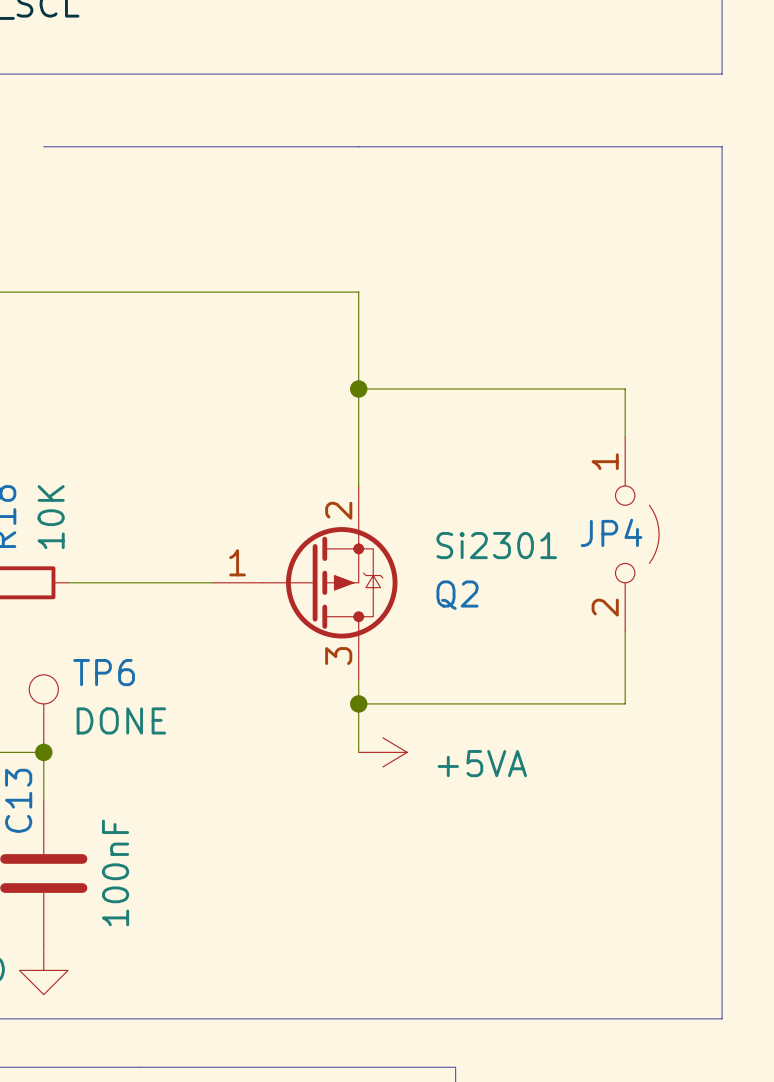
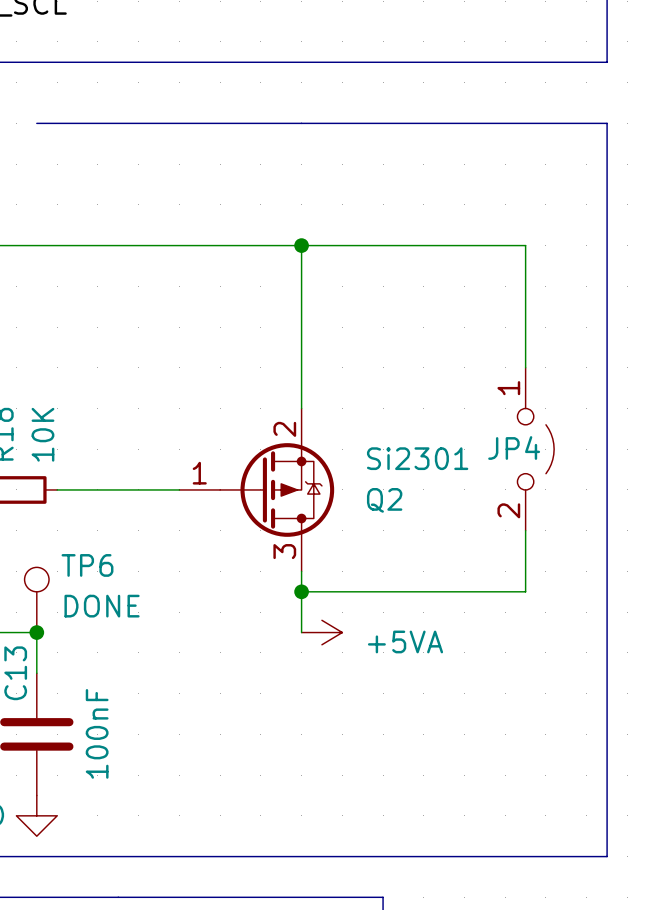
wire: (358, 389) (625, 389) -> (301, 245) (525, 245) (525, 327)
junction position: (358, 389) -> (301, 245)

